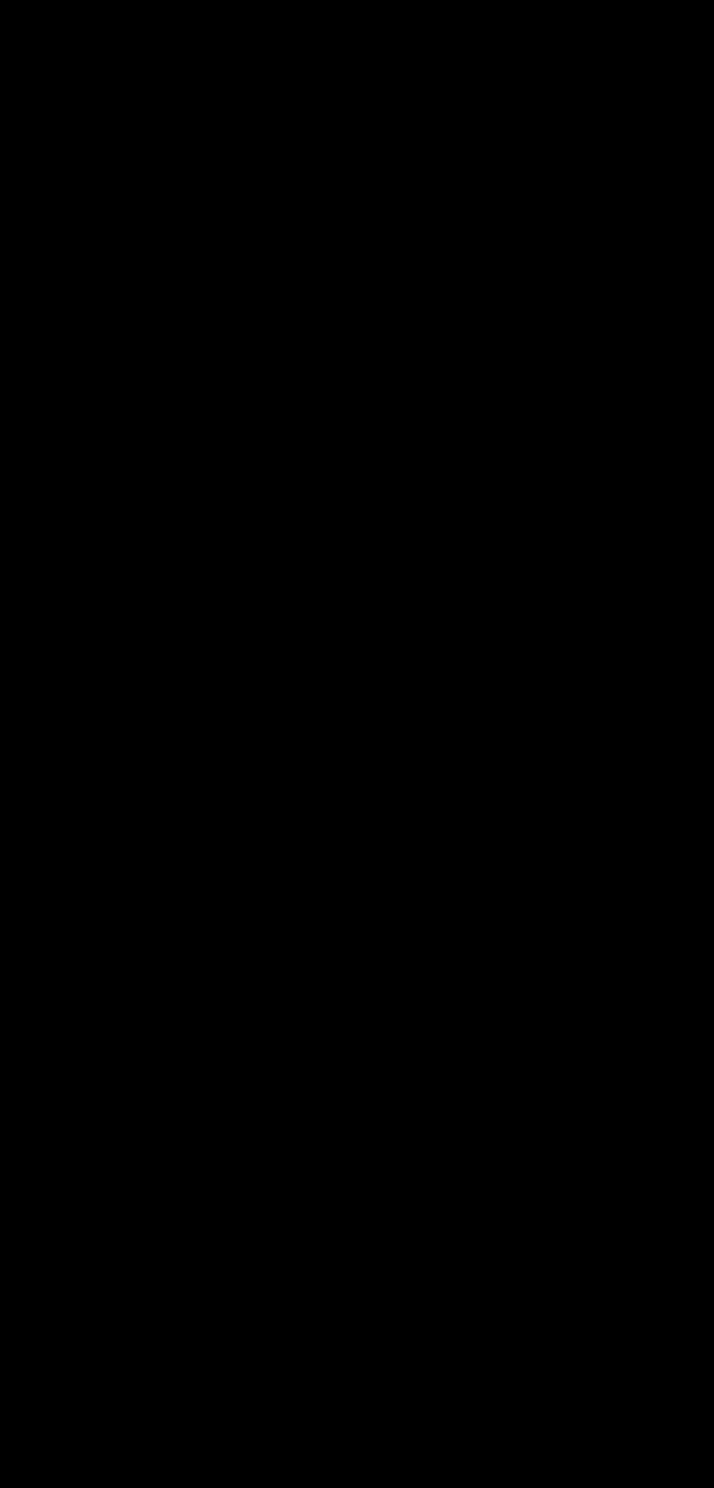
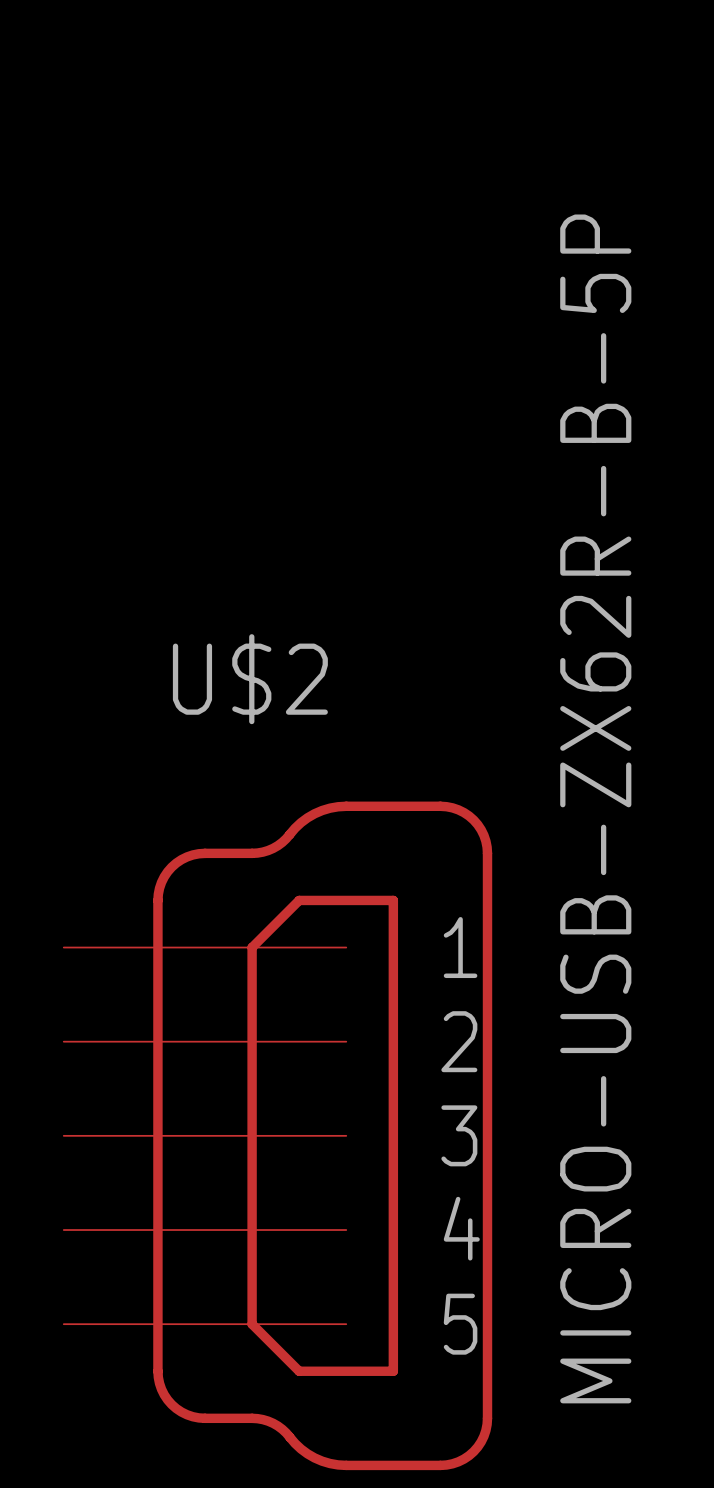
U$2: none -> MICRO-USB-ZX62R-B-5P (277, 1135)

